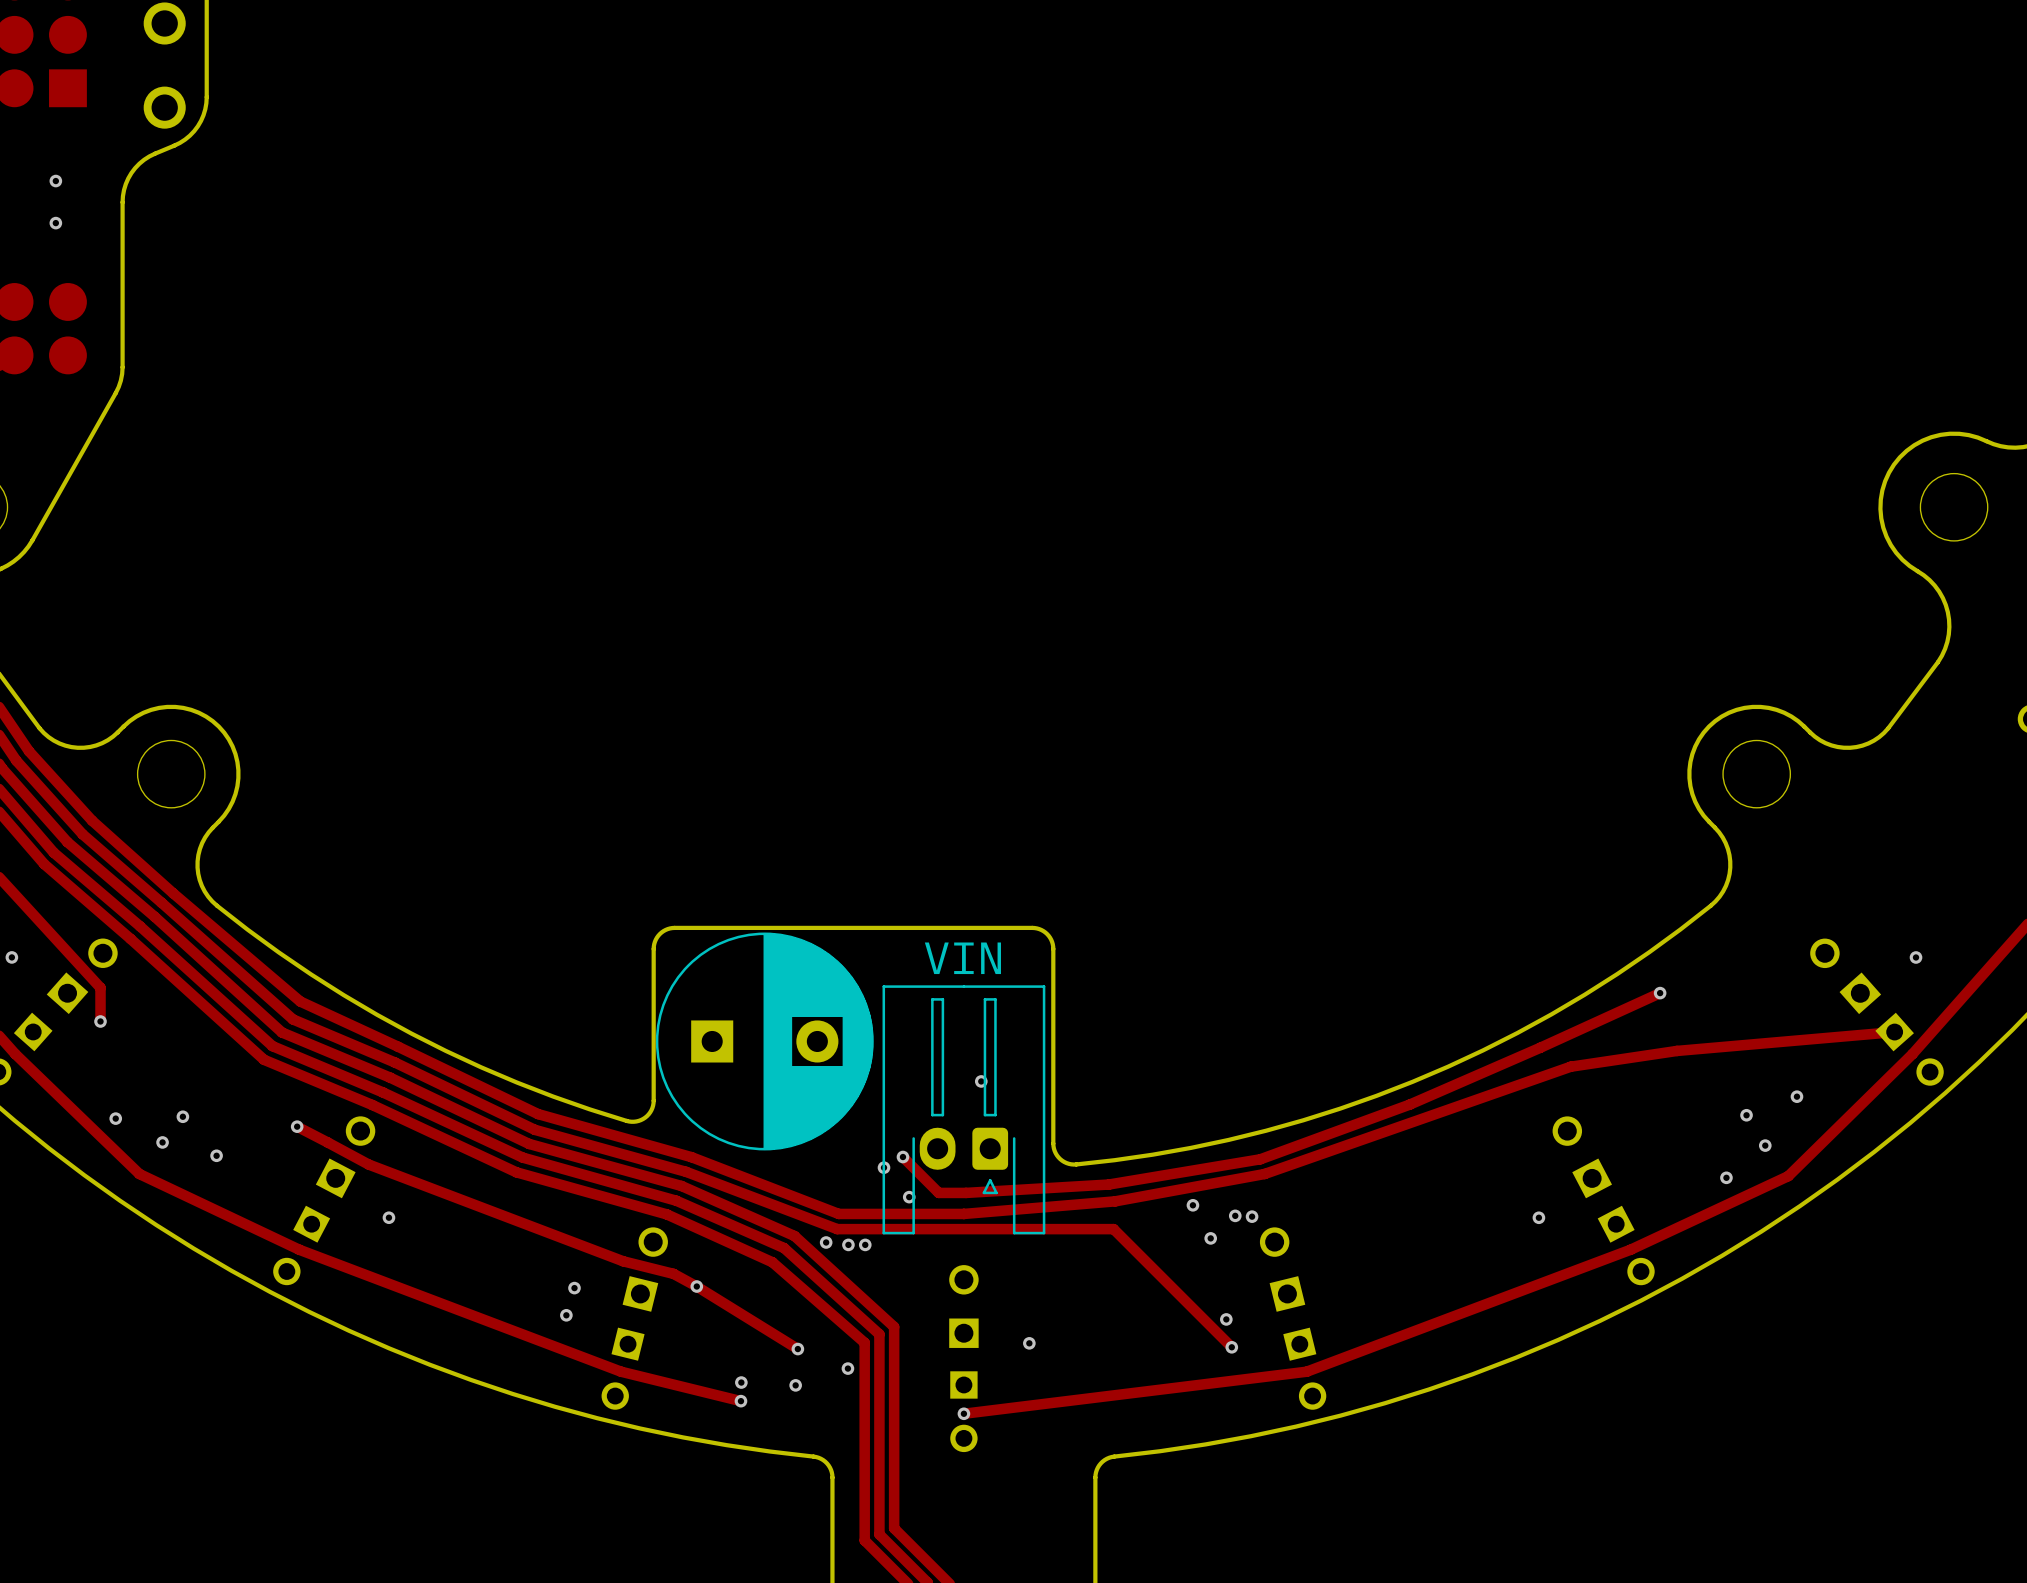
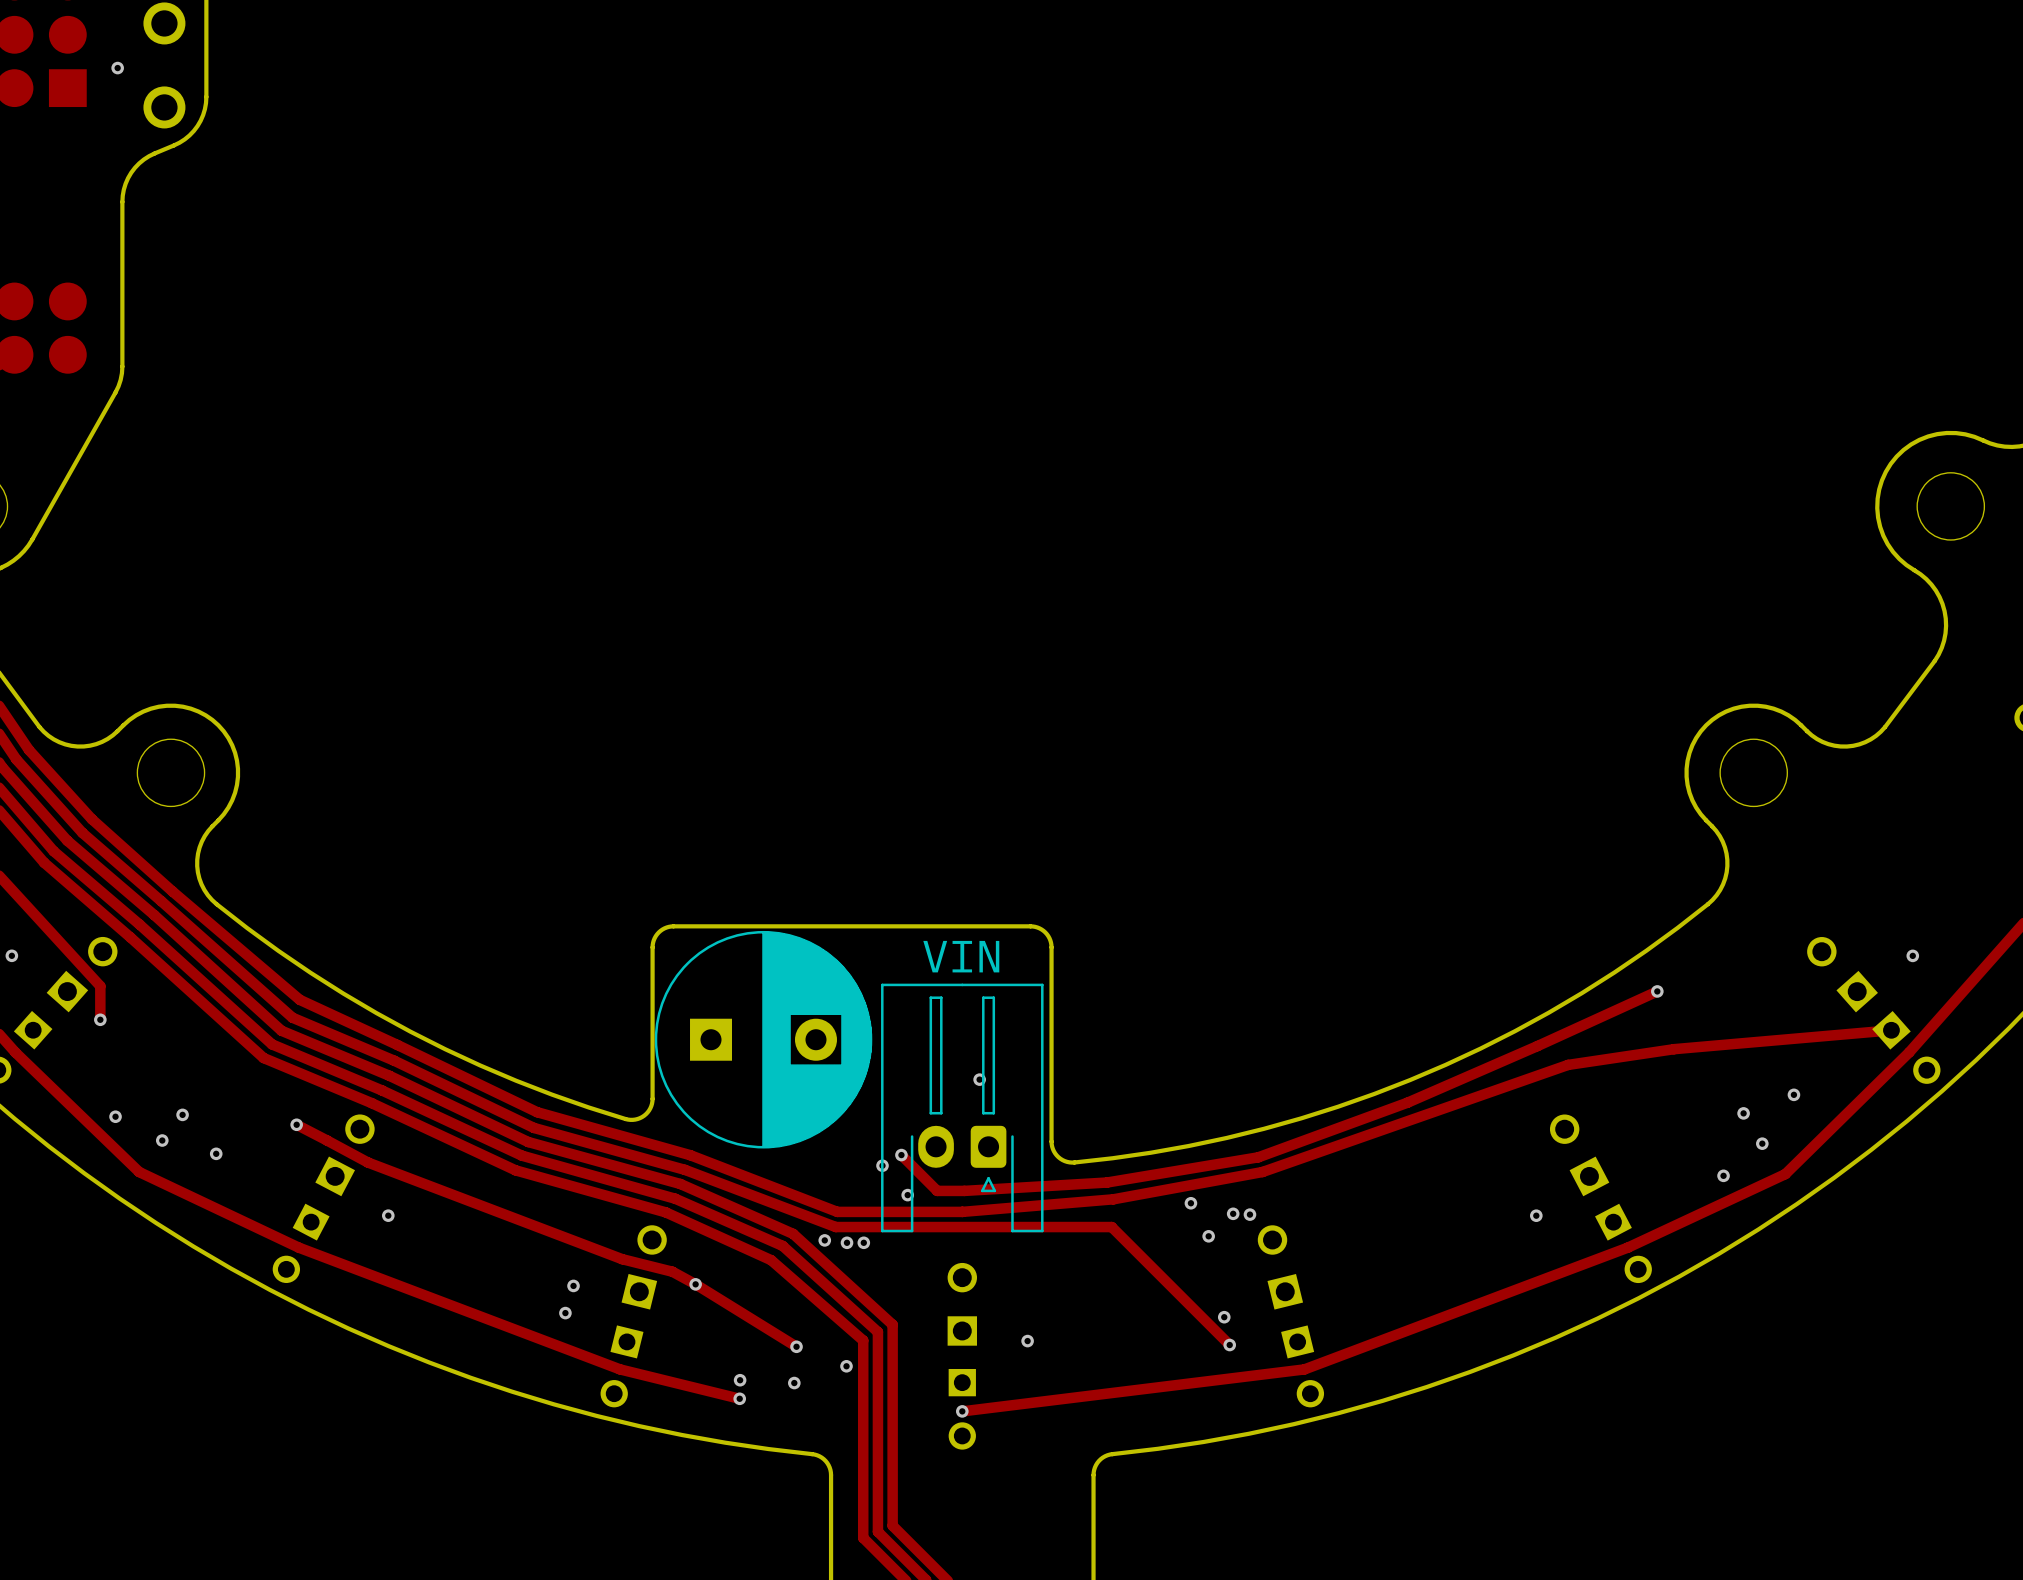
via: none -> (117, 68)
via: (55, 181) -> none
via: (55, 223) -> none

